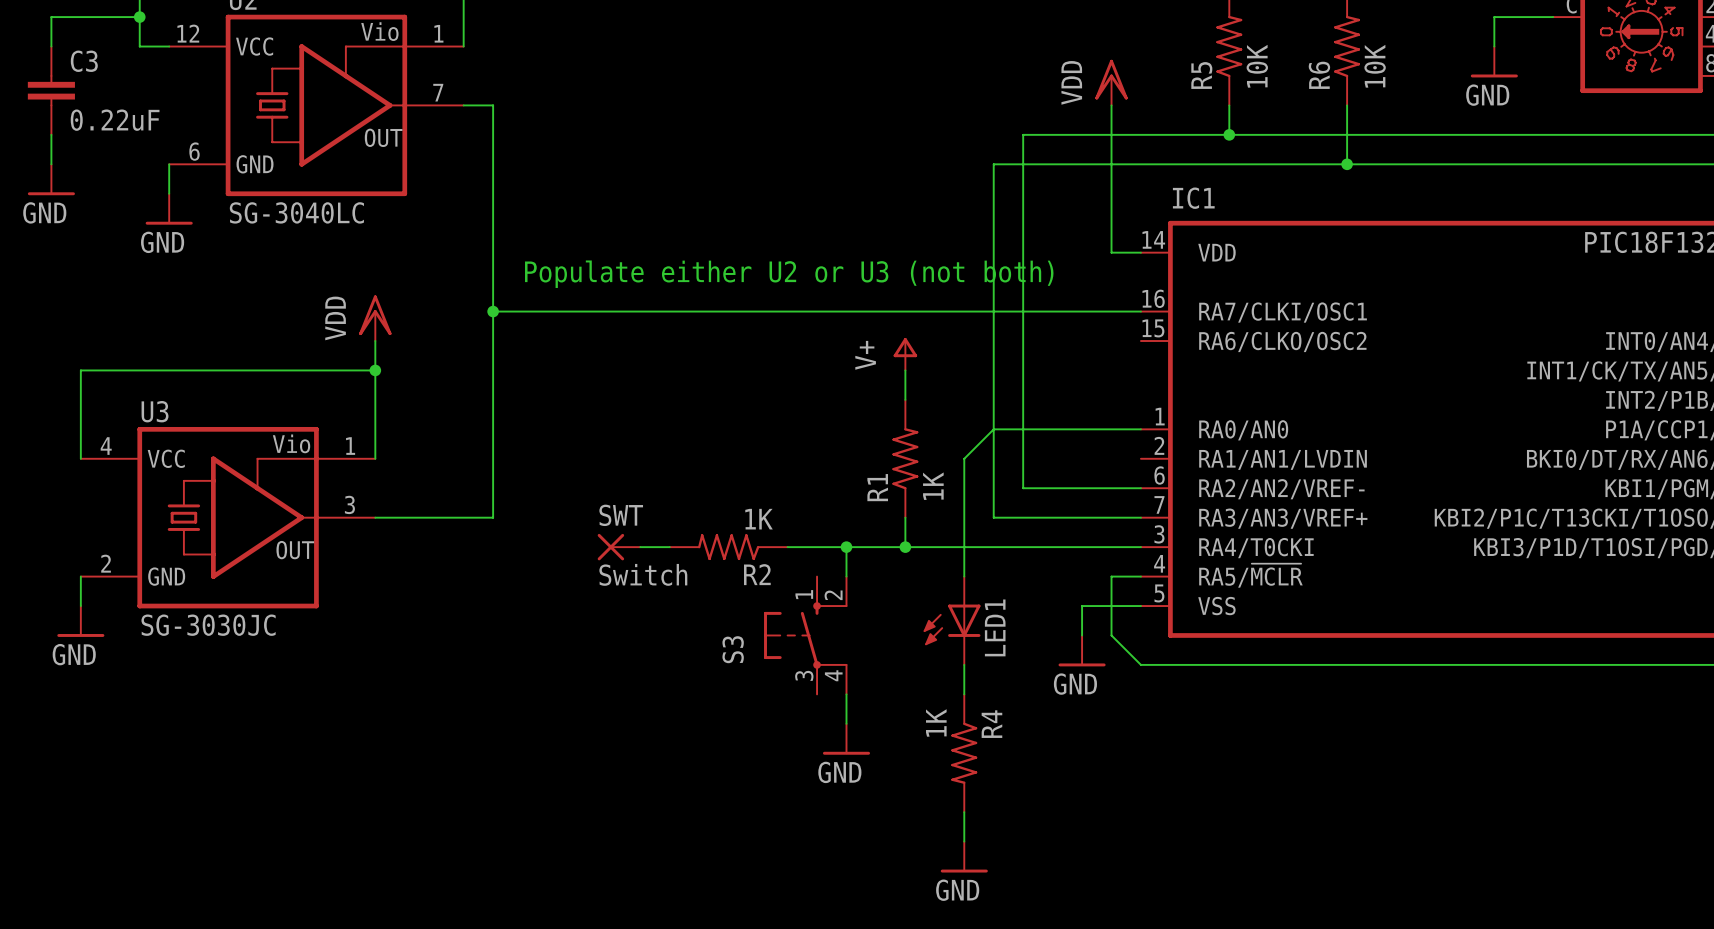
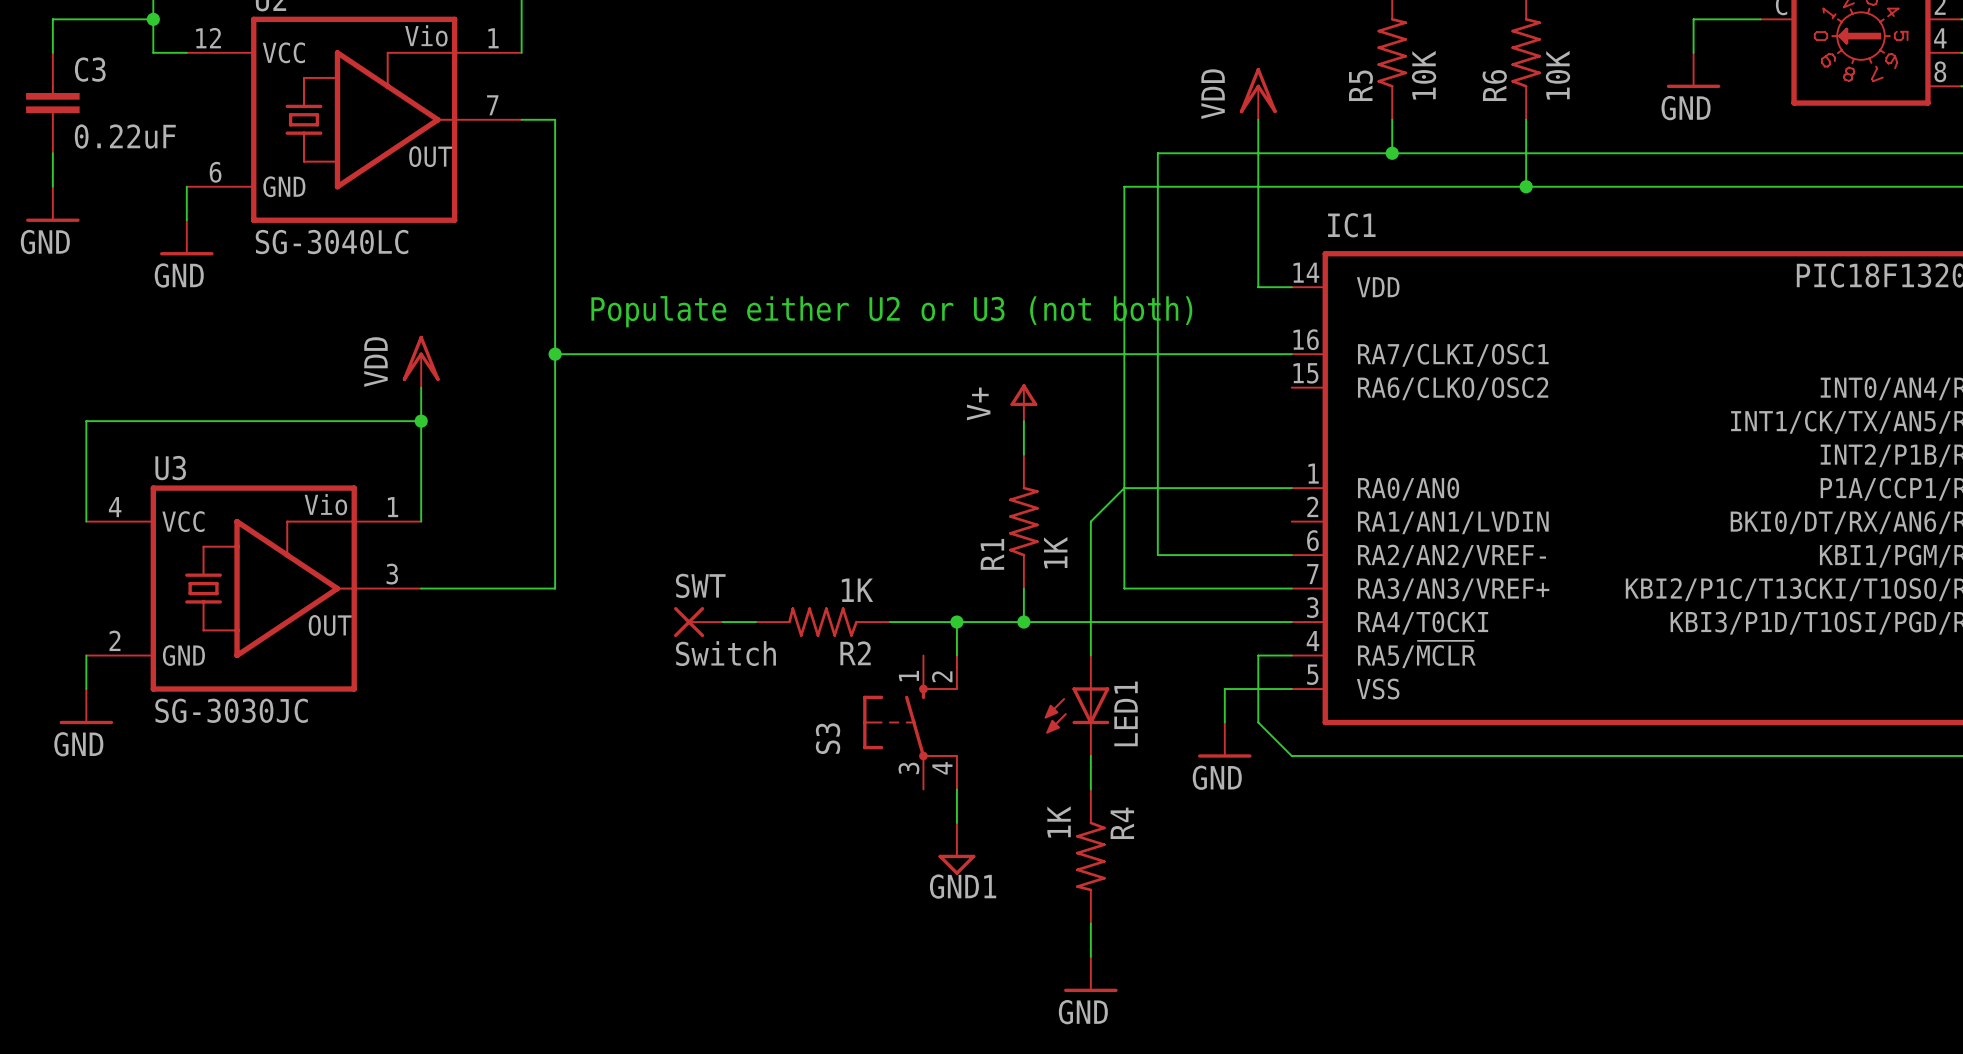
power symbol: GND (846, 739) -> GND1 (956, 848)

